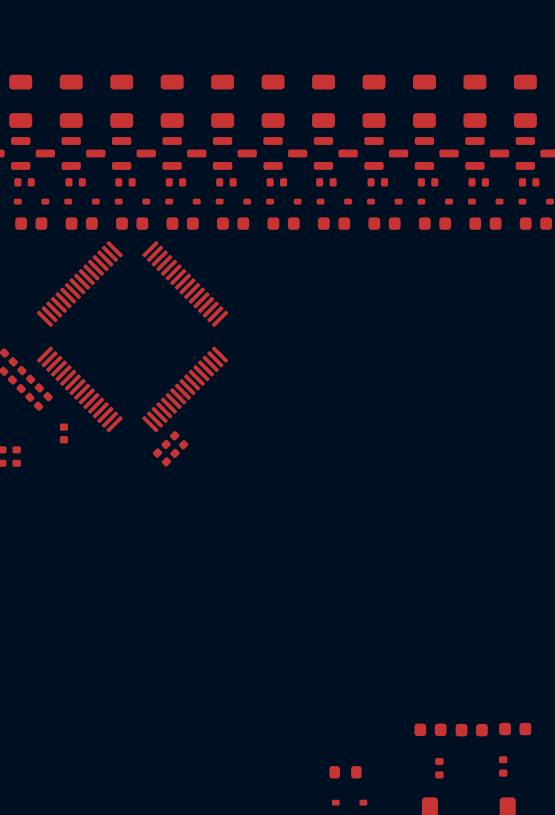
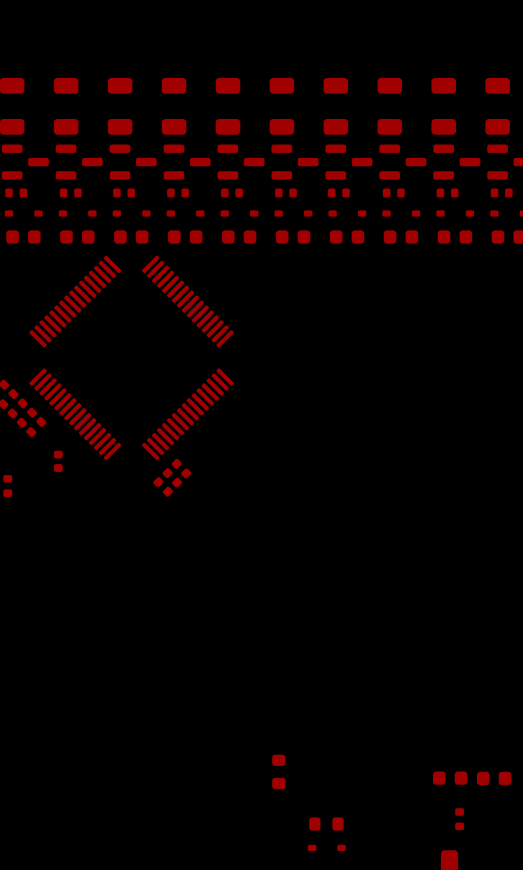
part: none -> (278, 771)
part position: (345, 772) -> (326, 824)
part position: (349, 802) -> (326, 847)

